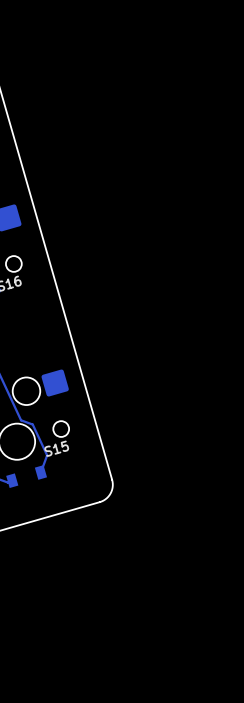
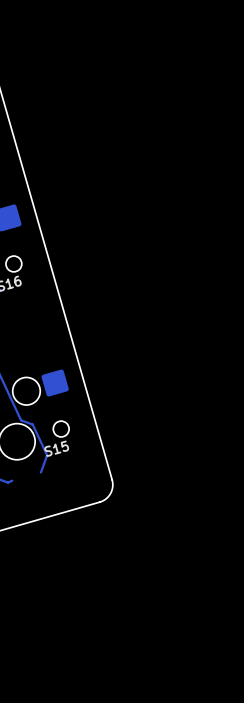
part: (26, 476) -> none

